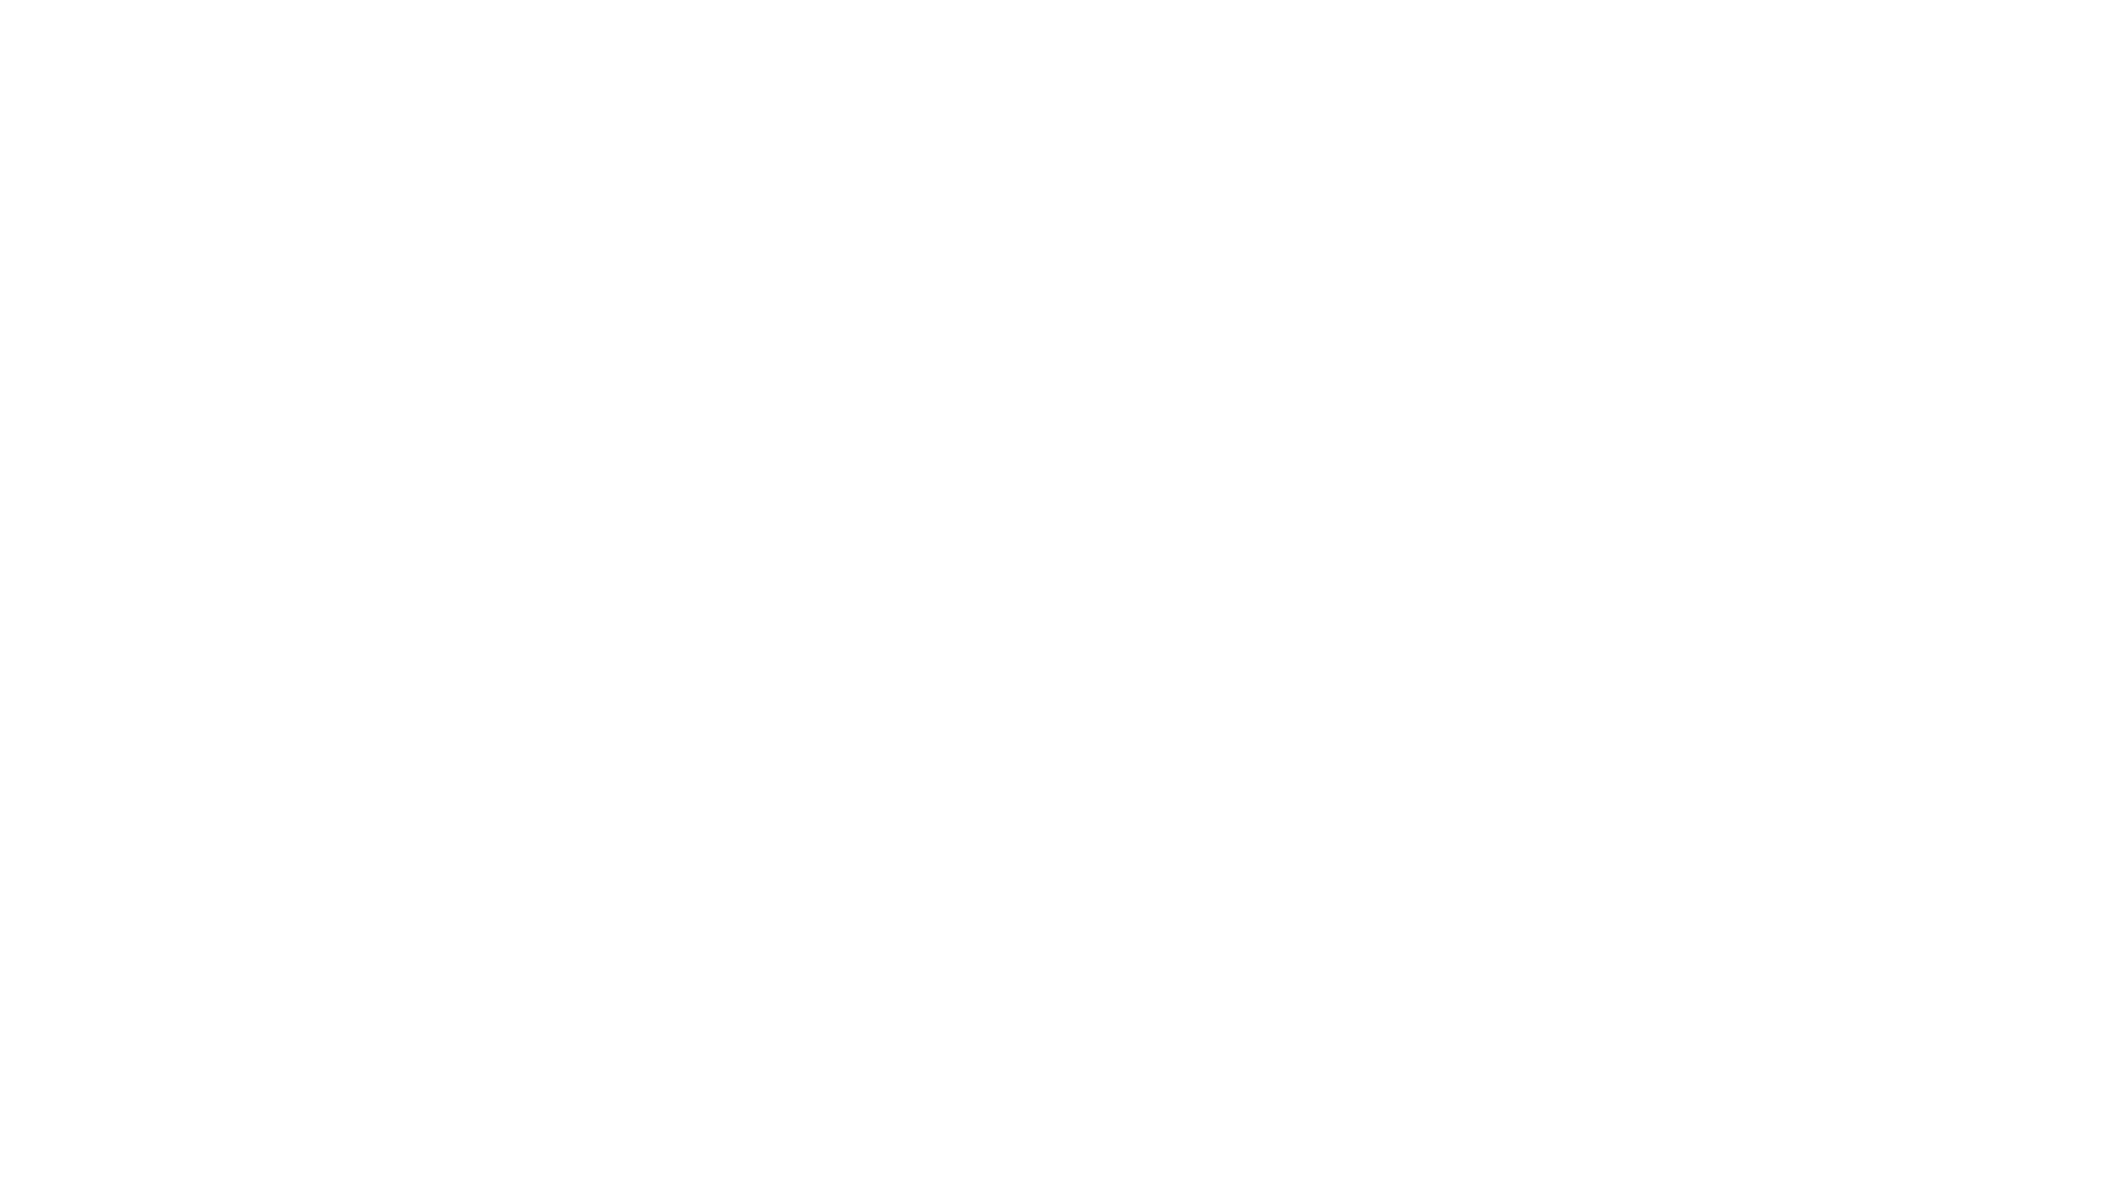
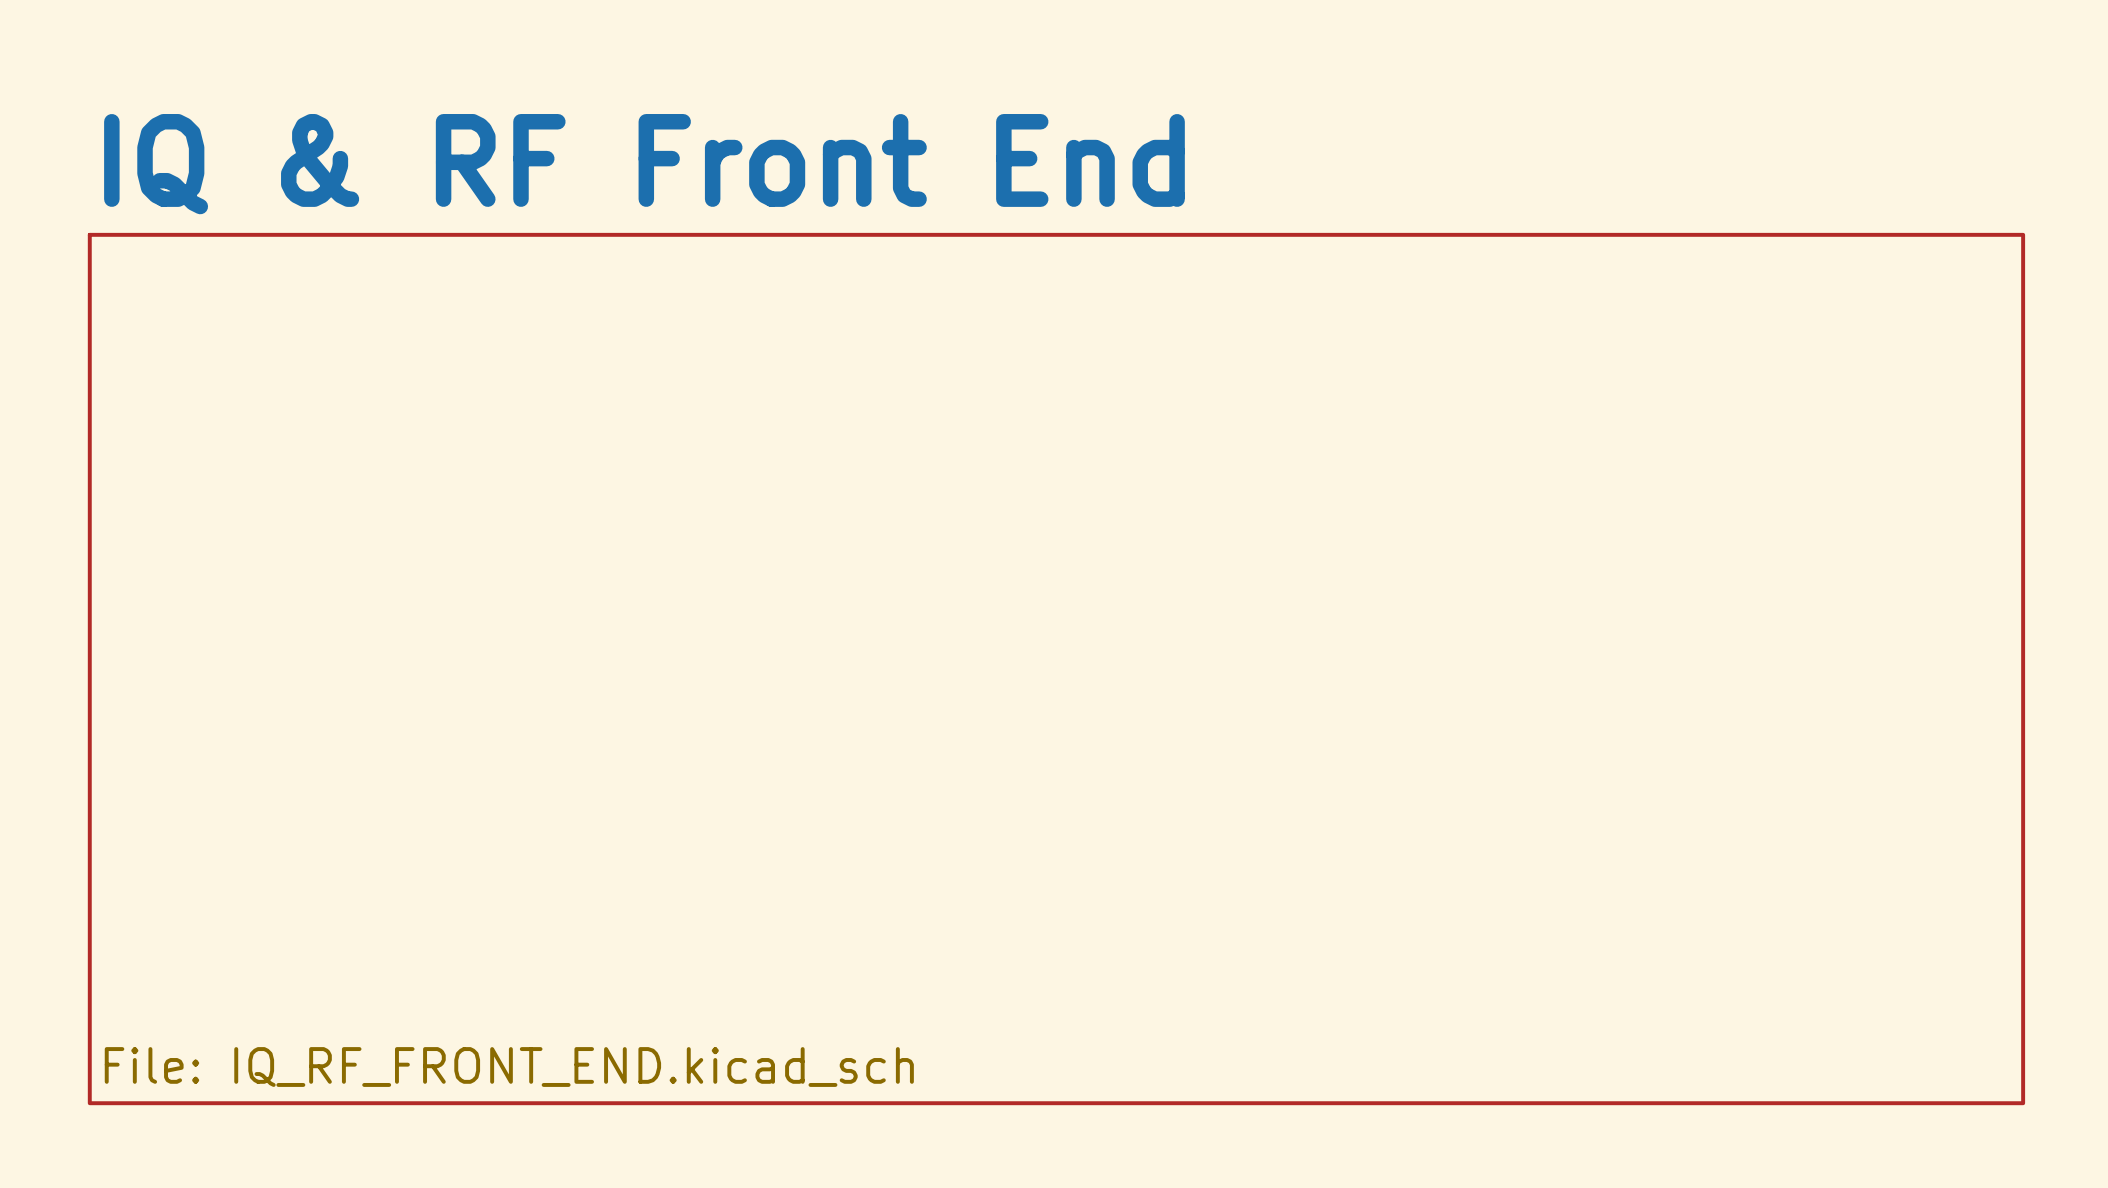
sheet IQ & RF Front End: none -> File: IQ_RF_FRONT_END.kicad_sch (1056, 669)

